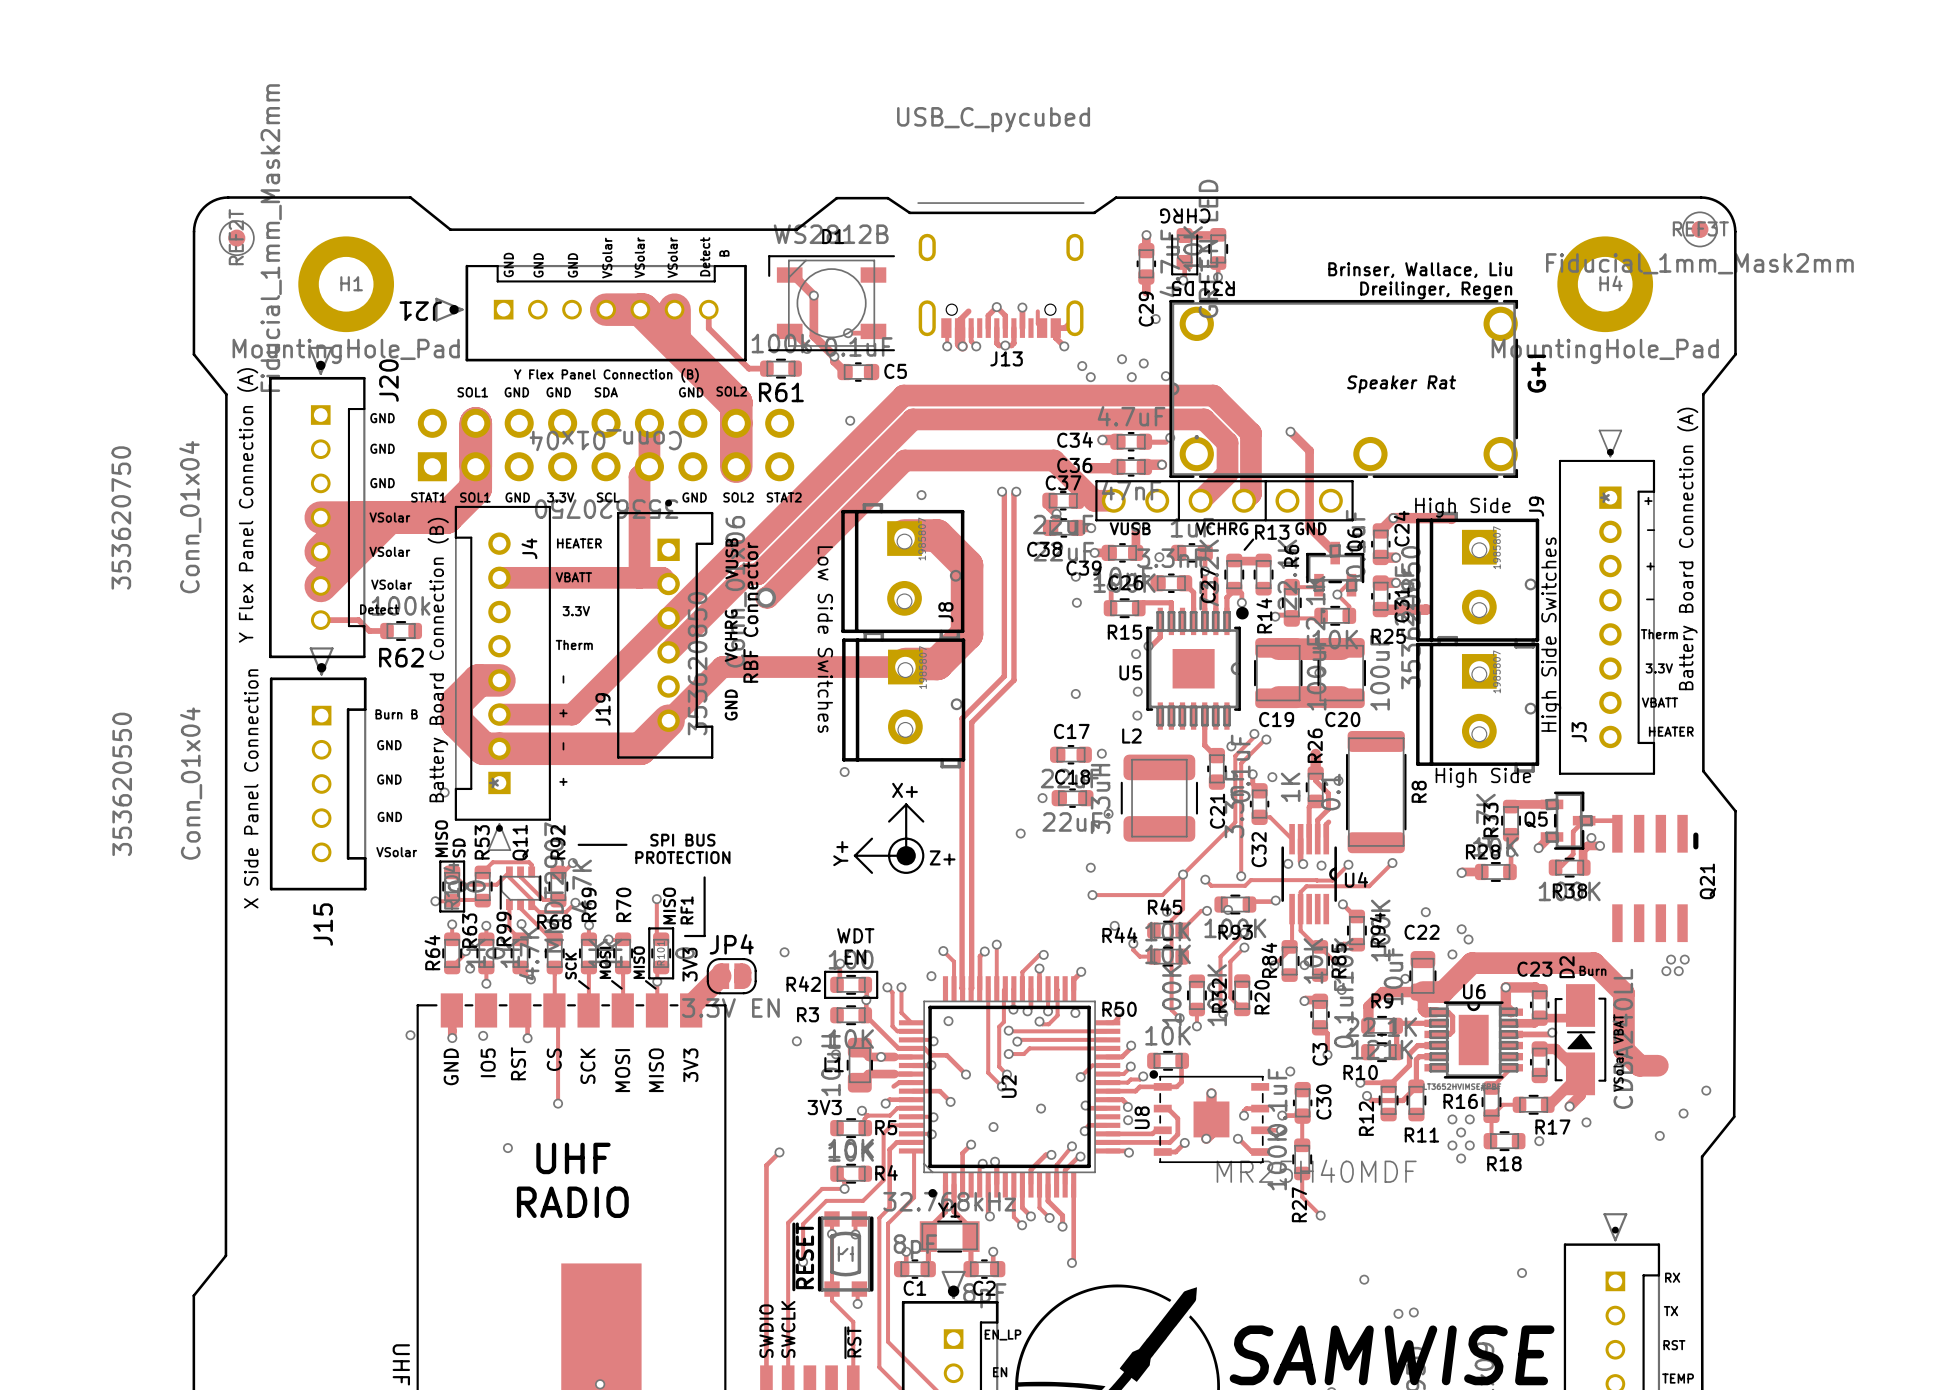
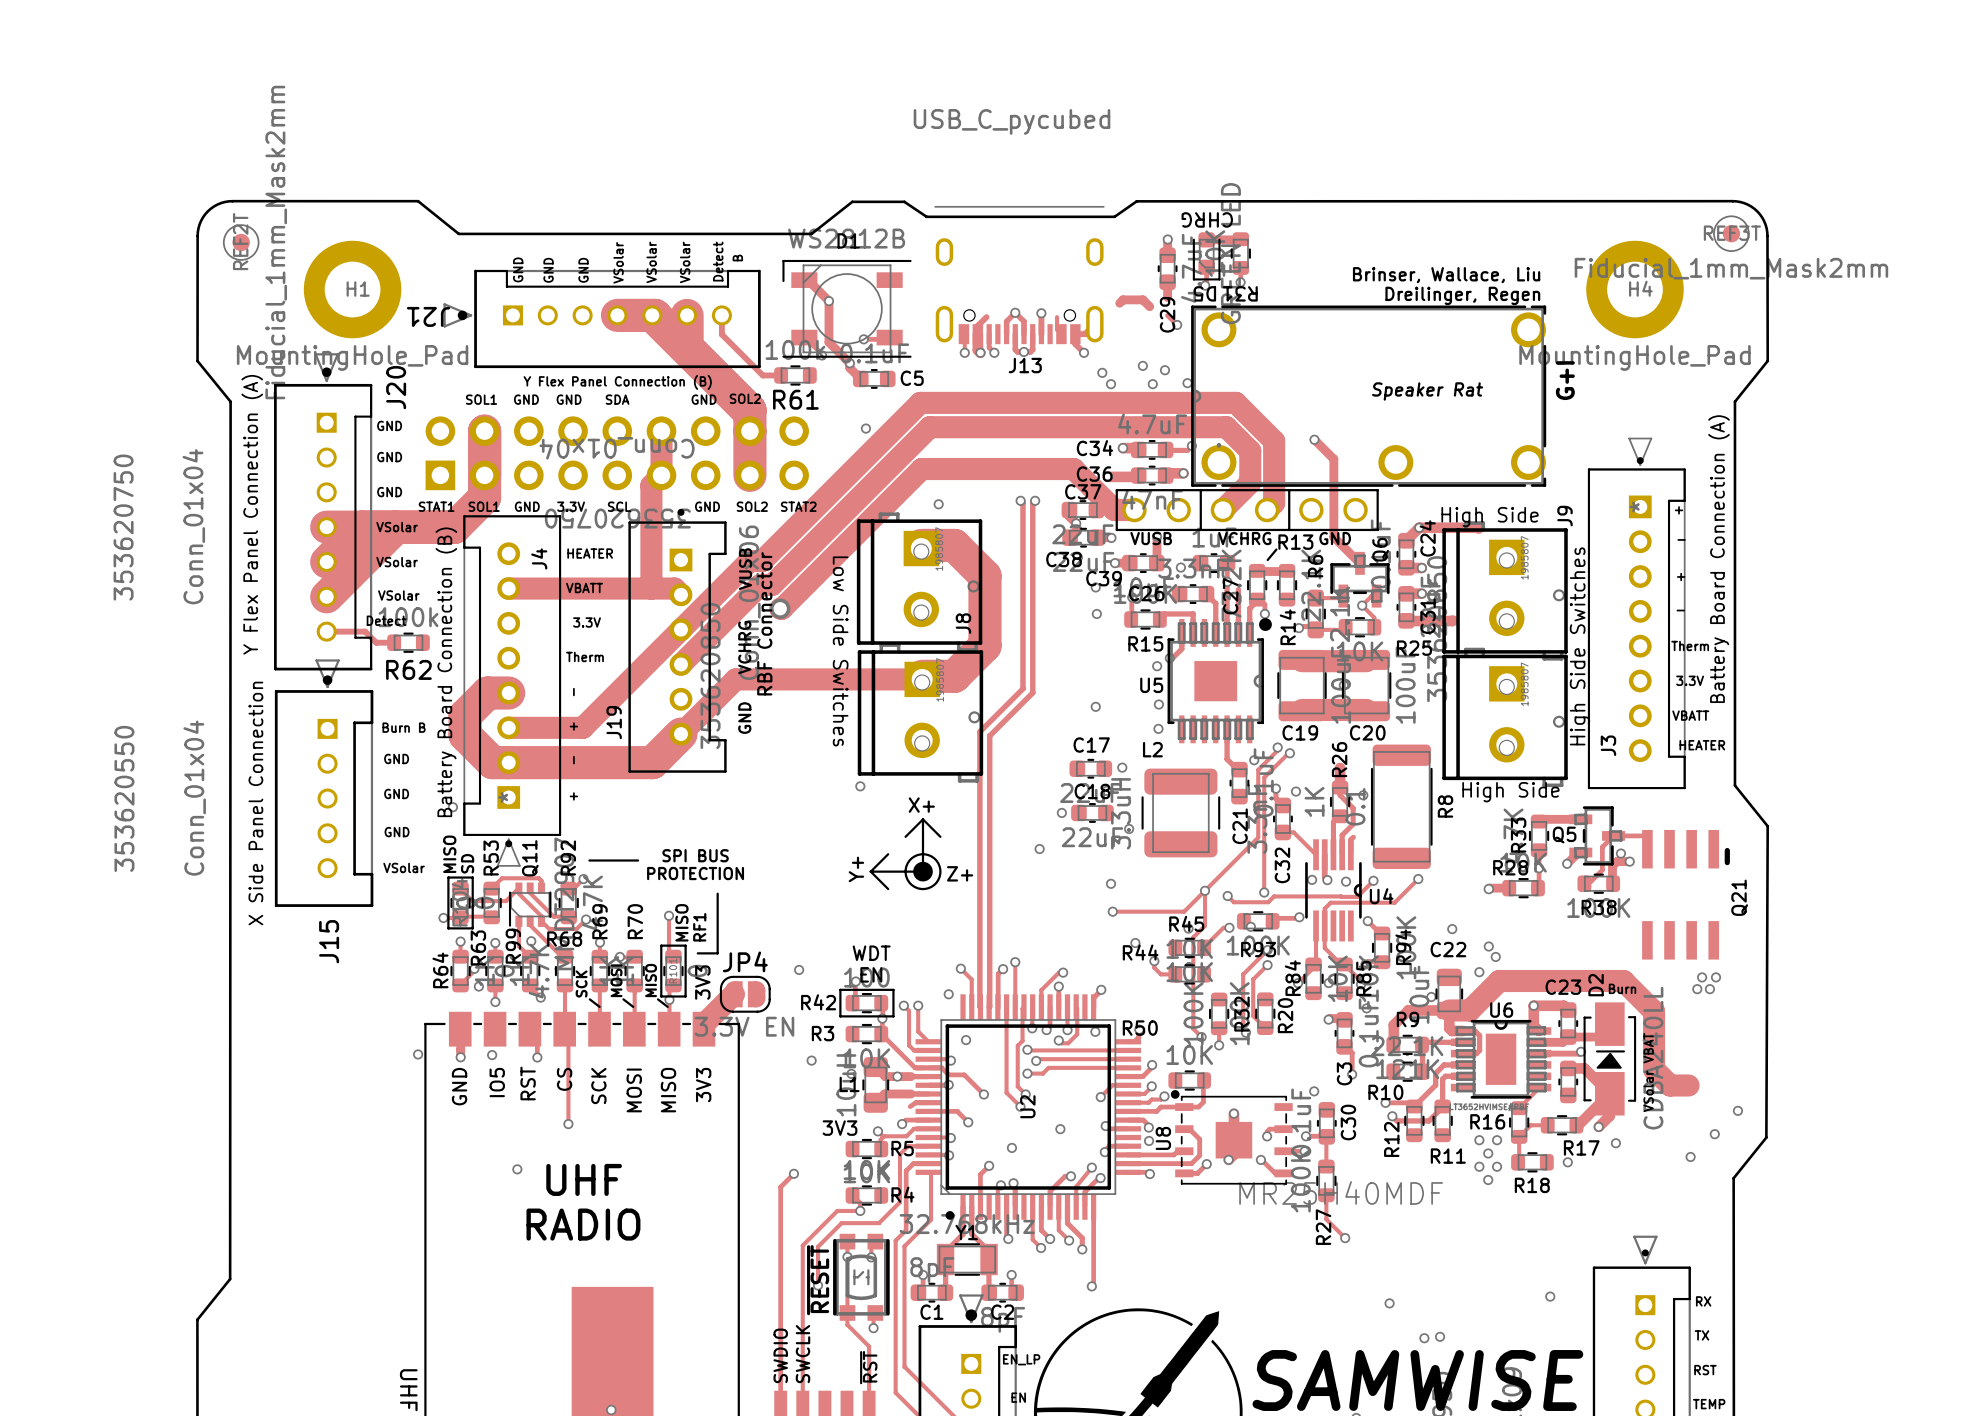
track: none -> (1119, 303) (1123, 299) (1142, 299) (1149, 306)
track: none -> (1167, 315) (1177, 324)

